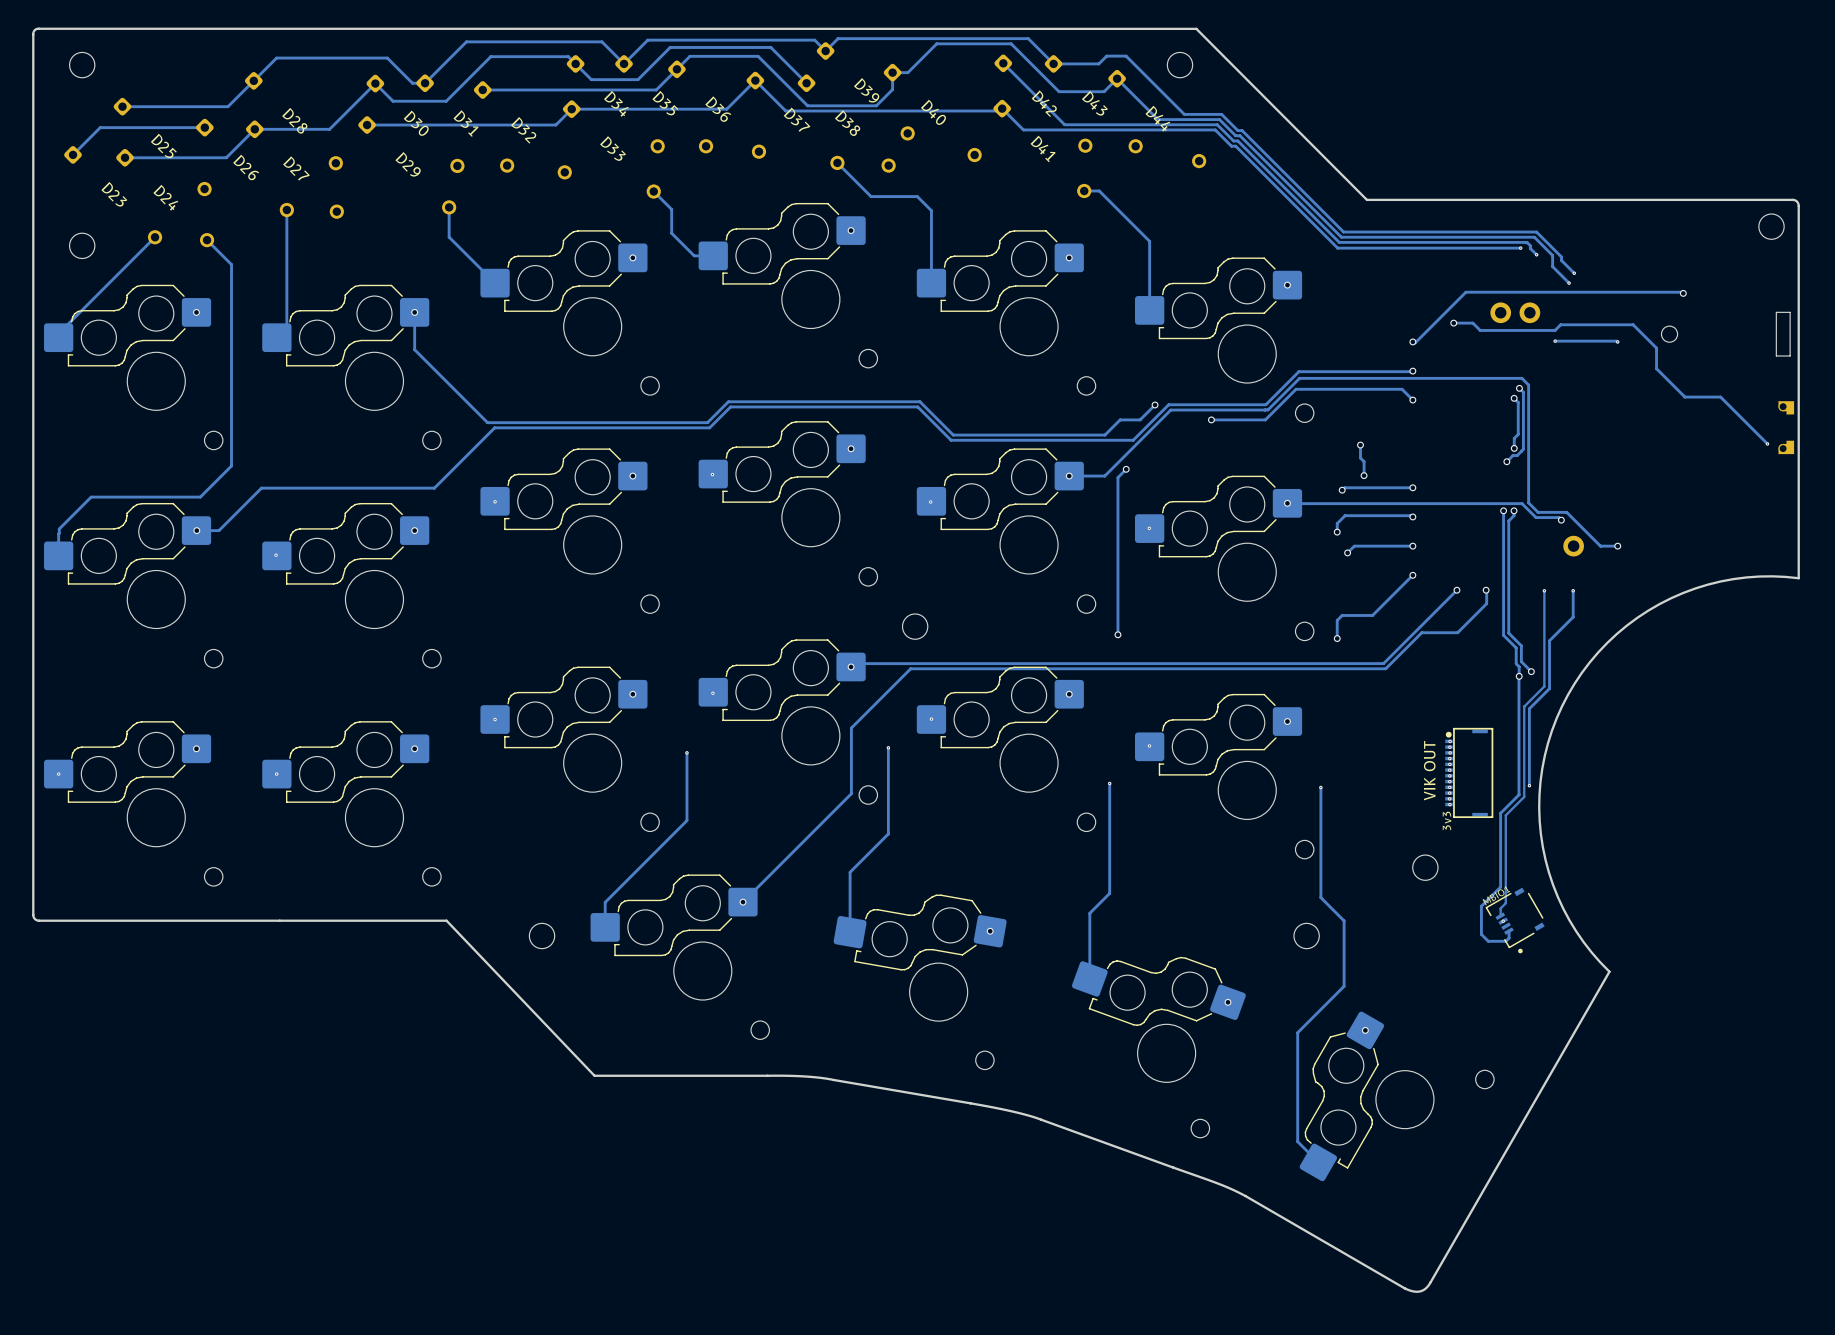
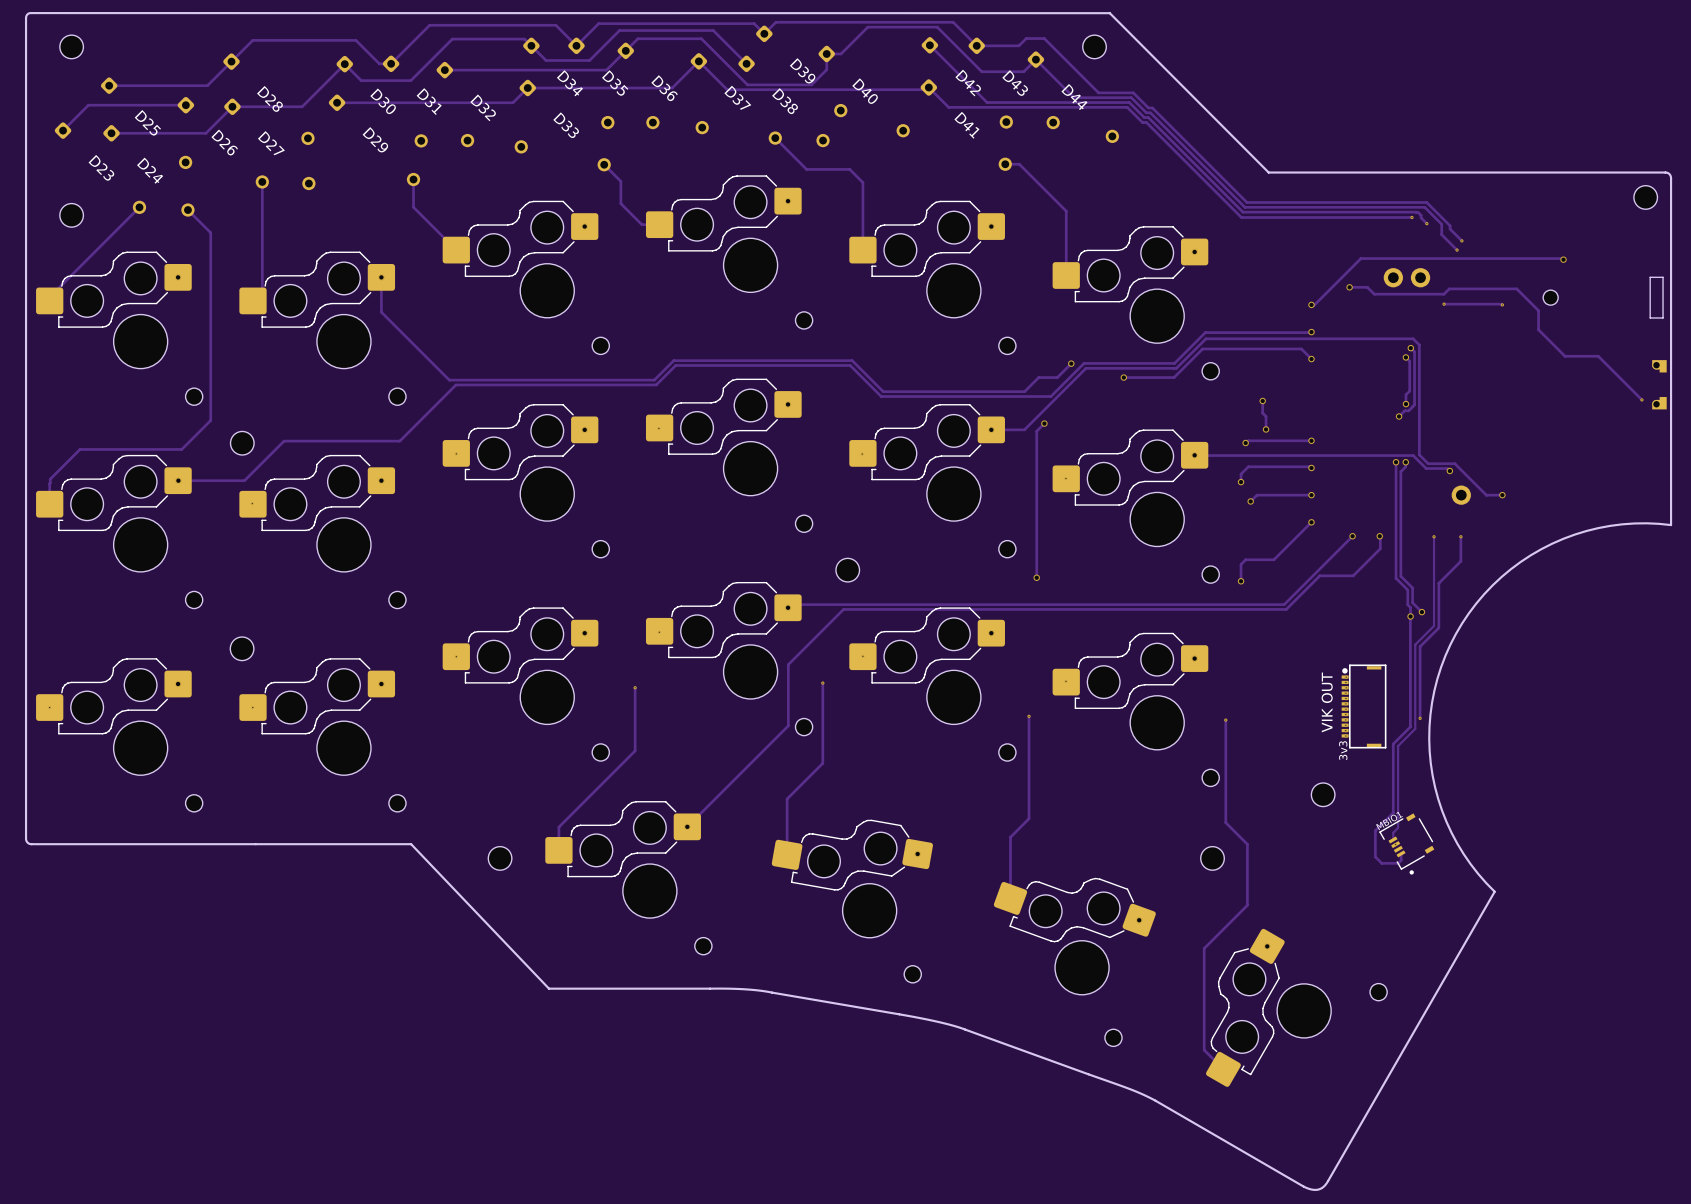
track: (310, 488) (261, 488) (219, 530) -> (284, 441) (244, 480) (199, 480)
part: none -> (242, 443)
part: none -> (242, 648)

